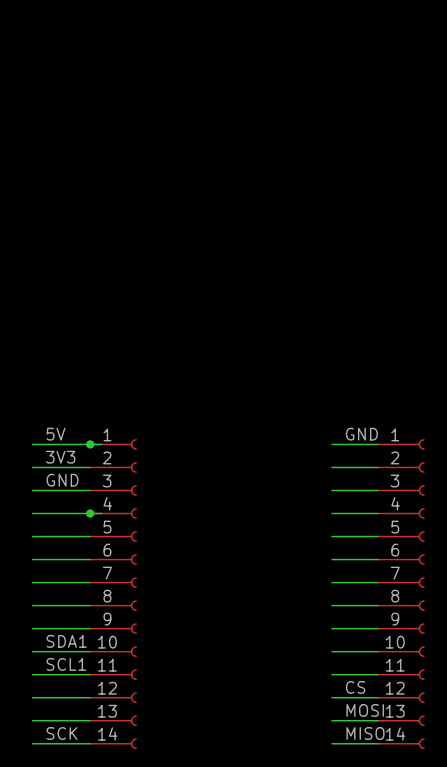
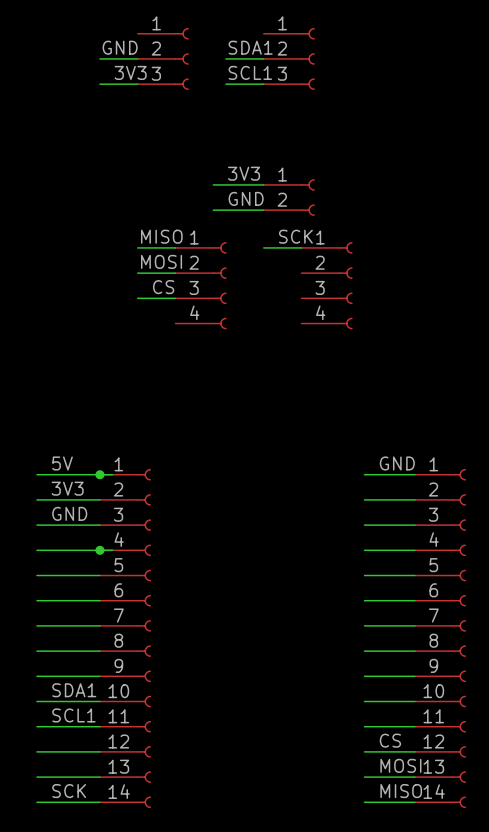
label: none -> GND (120, 47)
label: none -> SDA1 (250, 47)
wire: none -> (99, 58) (137, 58)
part: none -> (163, 58)
wire: none -> (225, 58) (263, 58)
part: none -> (289, 58)
label: none -> 3V3 (130, 72)
label: none -> SCL1 (250, 72)
wire: none -> (99, 84) (137, 84)
wire: none -> (225, 84) (263, 84)
label: none -> 3V3 (244, 173)
wire: none -> (213, 184) (263, 184)
part: none -> (289, 197)
label: none -> GND (246, 198)
wire: none -> (213, 210) (263, 210)
label: none -> MISO (161, 236)
label: none -> SCK (295, 236)
wire: none -> (137, 247) (175, 247)
wire: none -> (263, 247) (301, 247)
label: none -> MOSI (161, 261)
wire: none -> (137, 273) (175, 273)
part: none -> (201, 285)
part: none -> (327, 285)
label: none -> CS (163, 287)
wire: none -> (137, 298) (175, 298)

